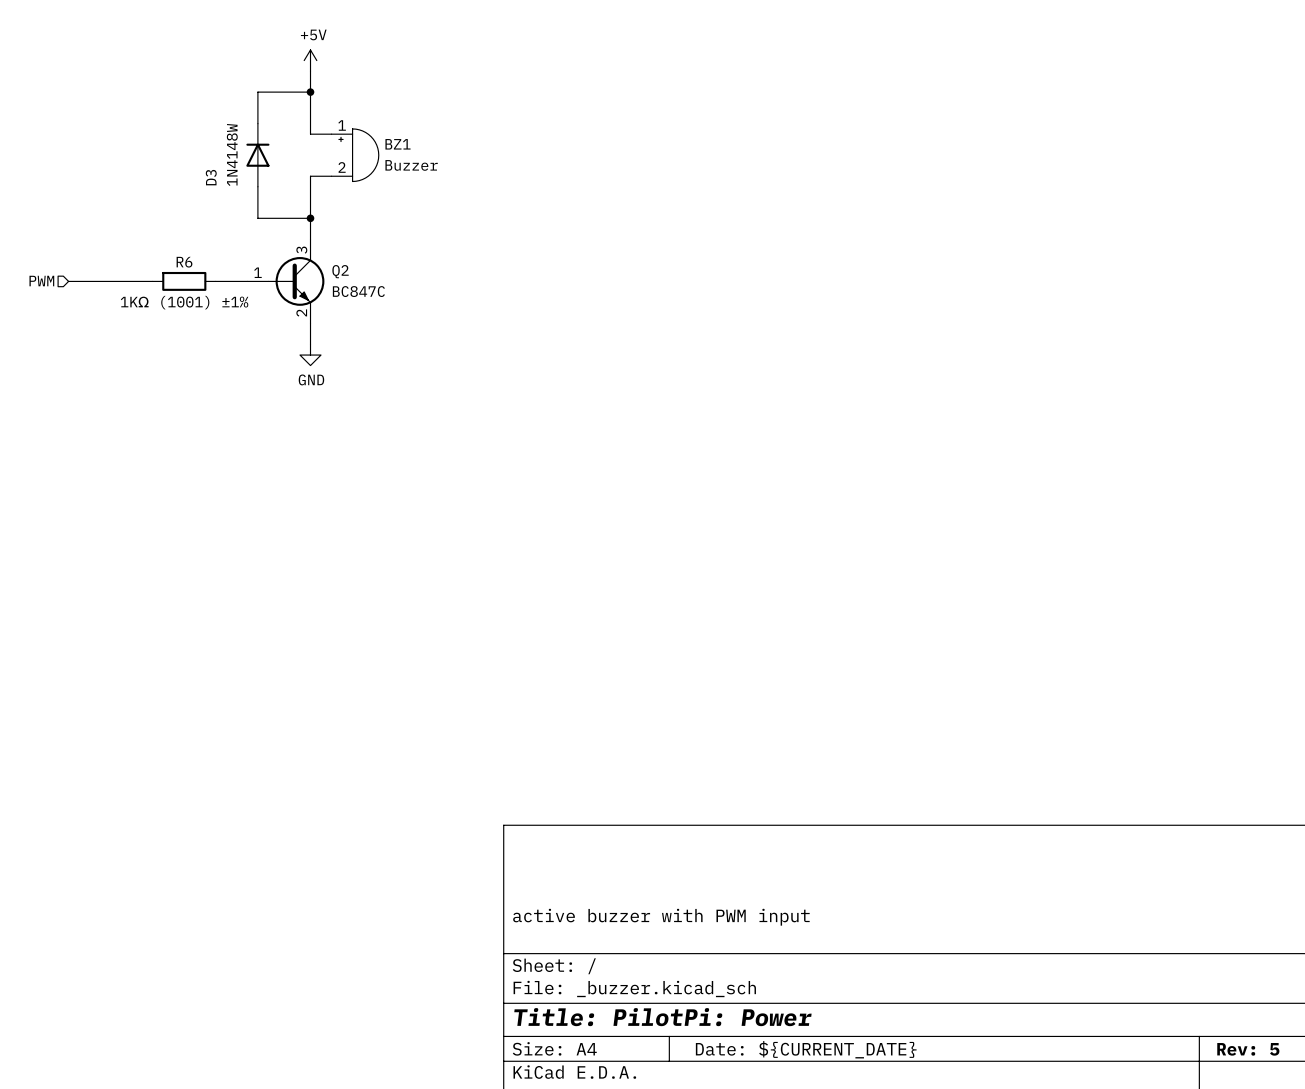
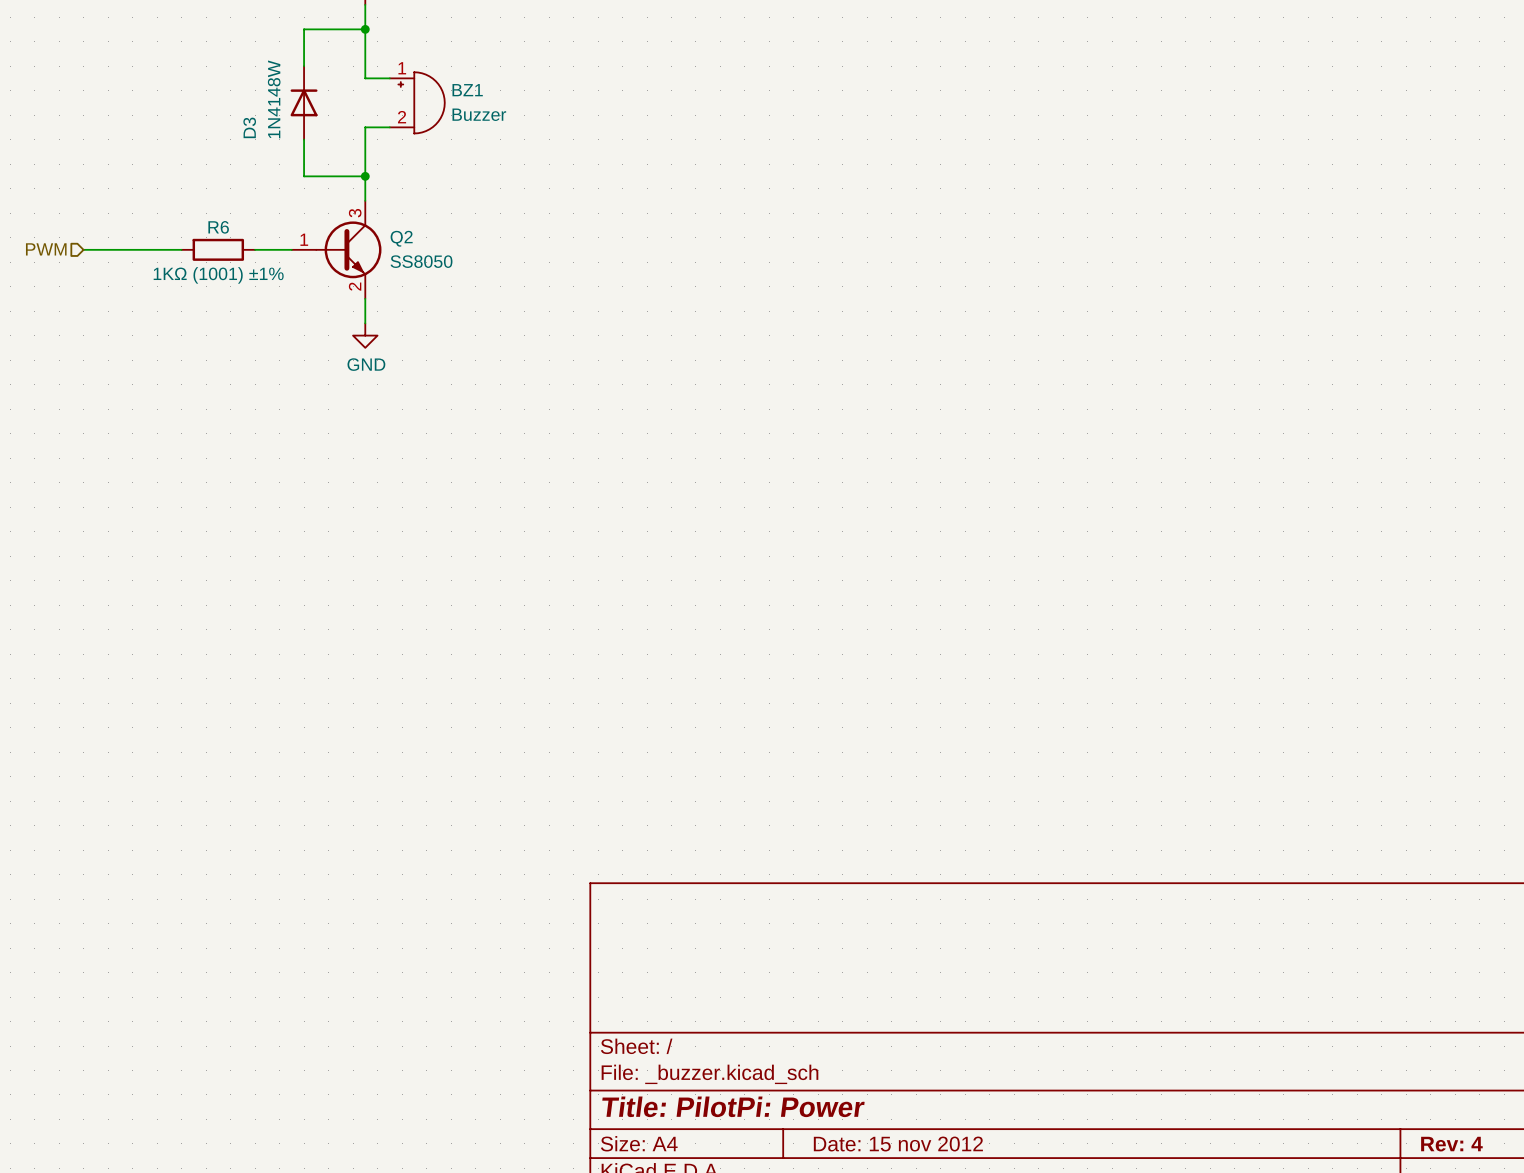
Q2 value: BC847C (358, 291) -> SS8050 (421, 261)
title block: active buzzer with PWM input (661, 917) -> none
title block: Date: ${CURRENT_DATE} (806, 1049) -> Date: 15 nov 2012 (898, 1144)
title block: Rev: 5 (1248, 1049) -> Rev: 4 (1451, 1144)

